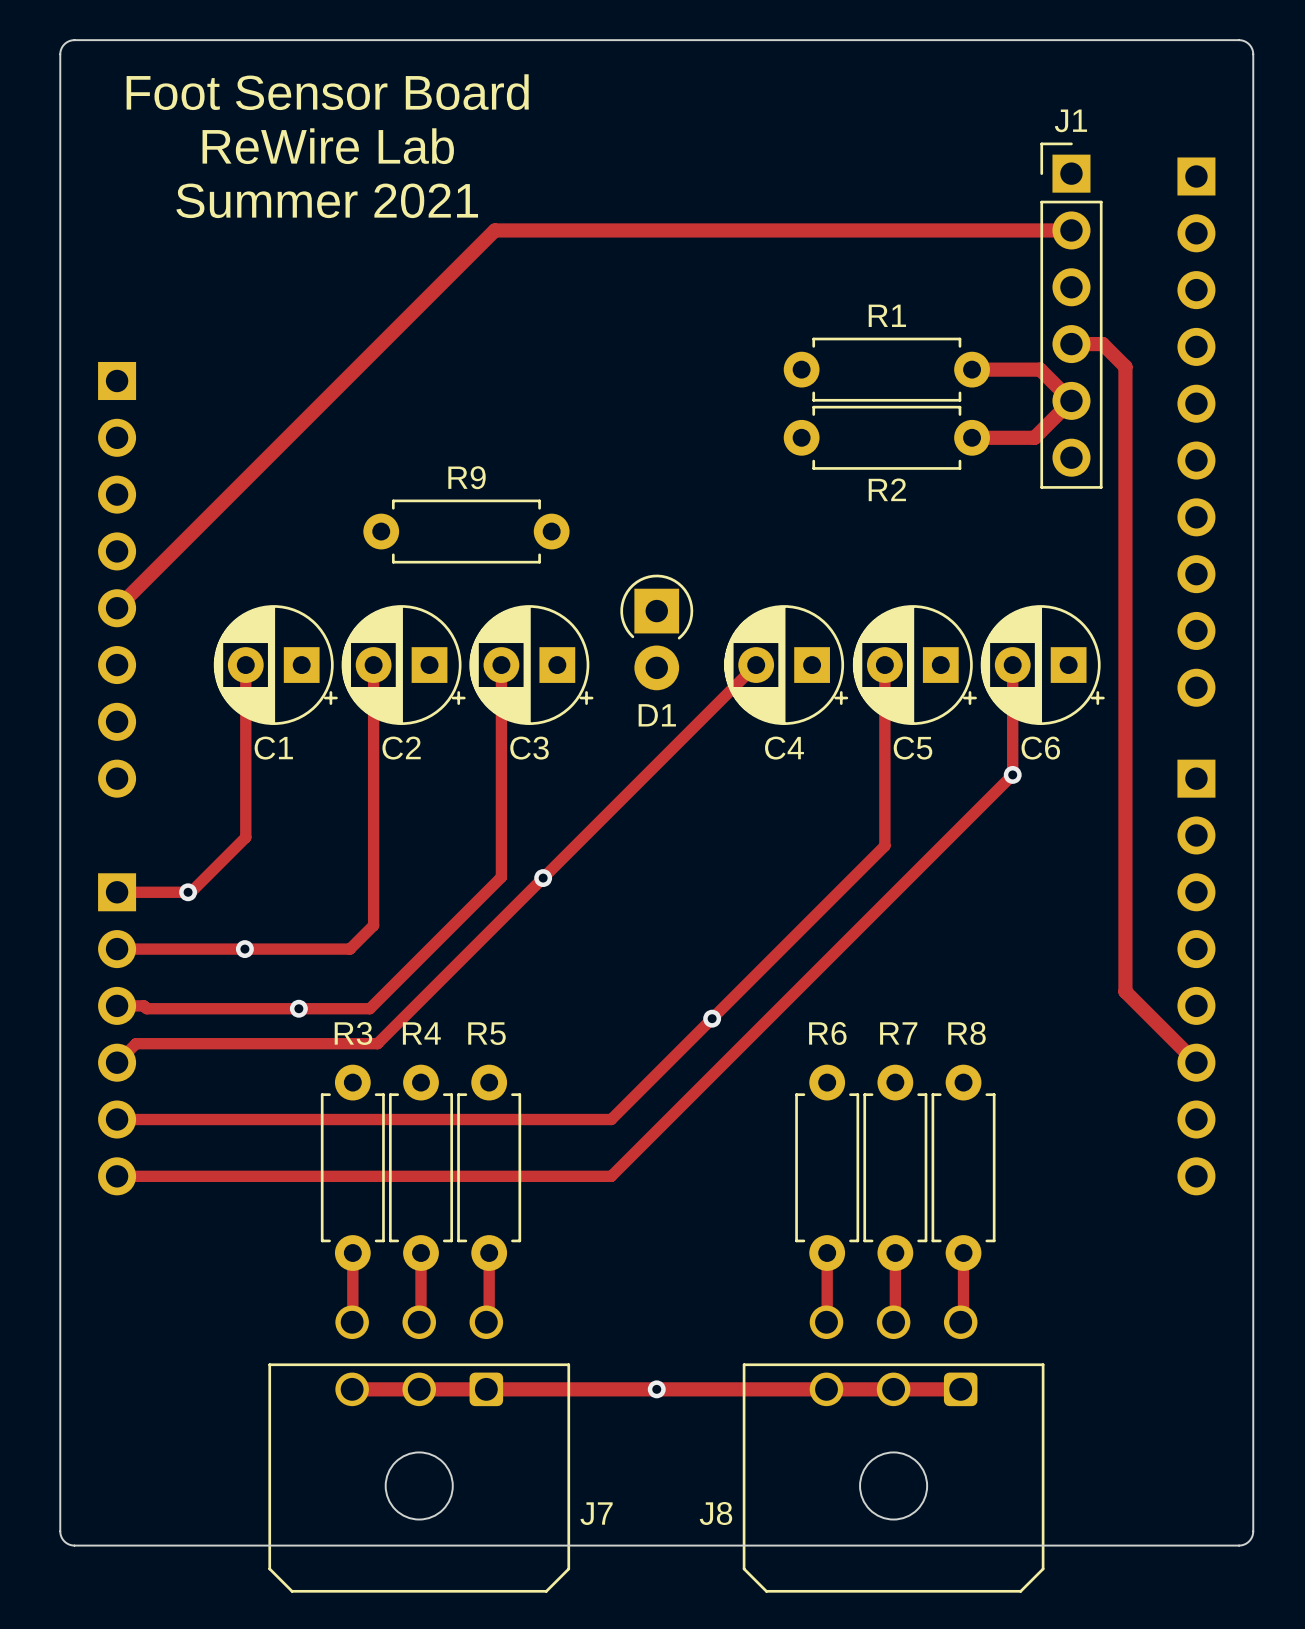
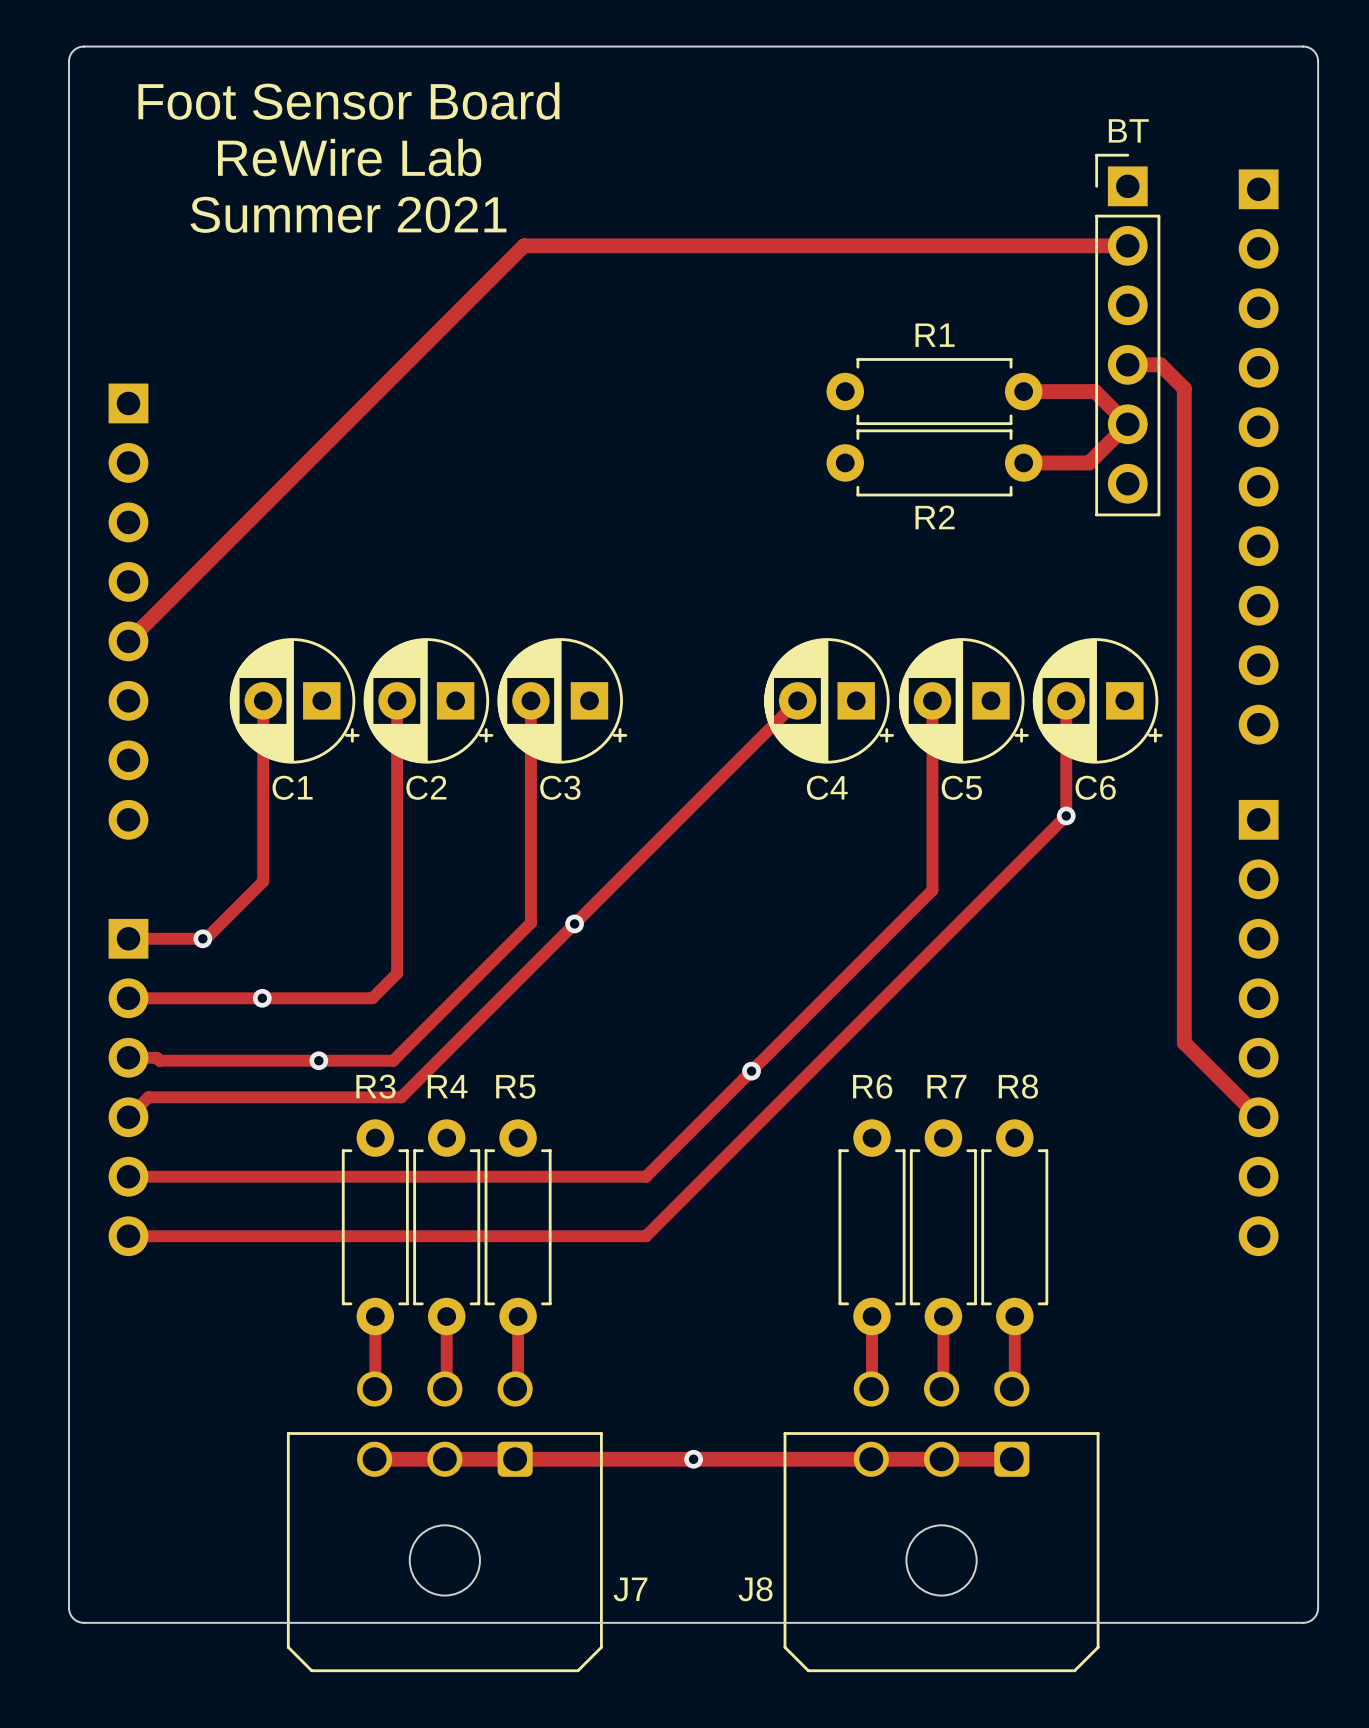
J1 name: J1 (1070, 120) -> BT (1128, 130)
R9: (466, 531) -> none
D1: (656, 632) -> none

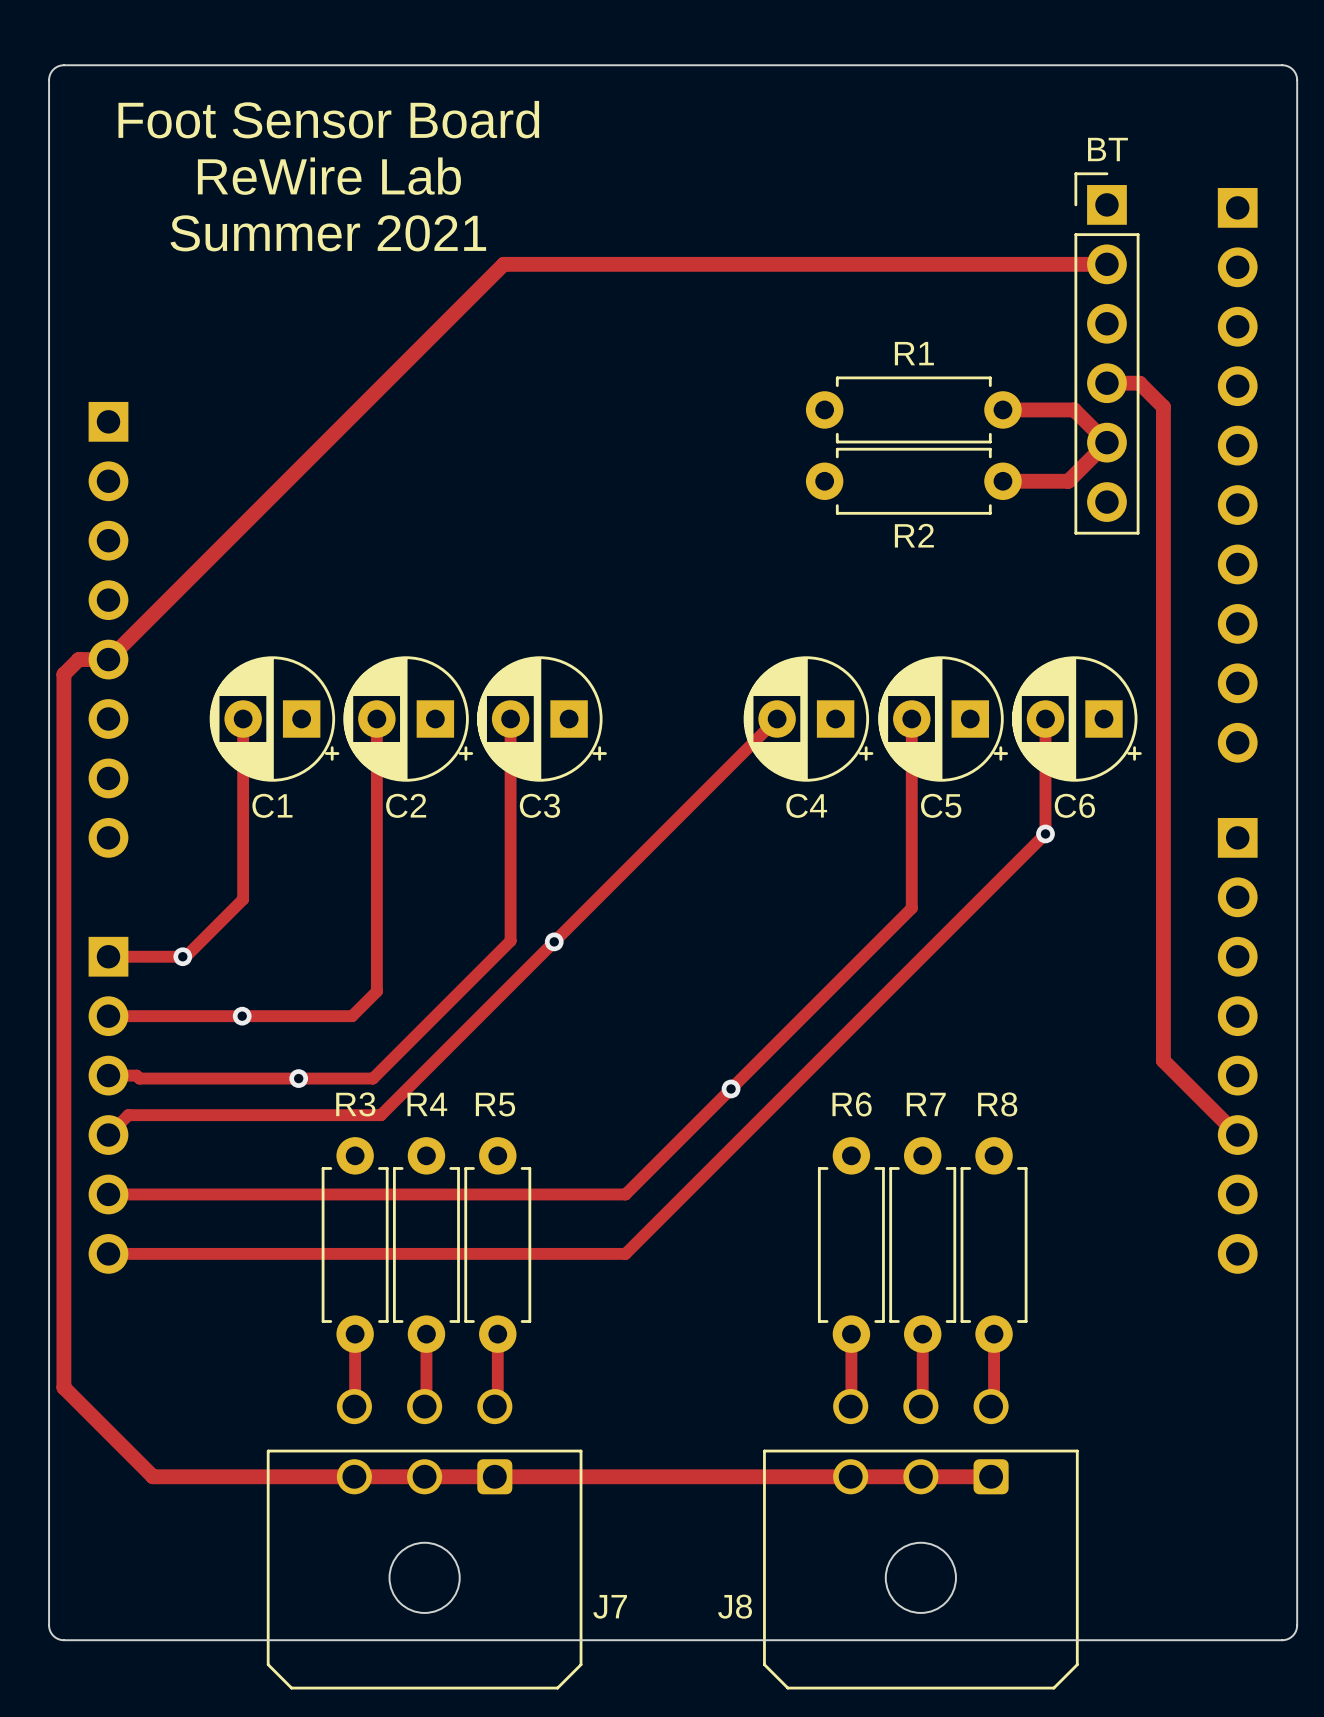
track: none -> (108, 659) (78, 659) (63, 674) (63, 1387) (153, 1476) (354, 1476)
via: (693, 1459) -> none

